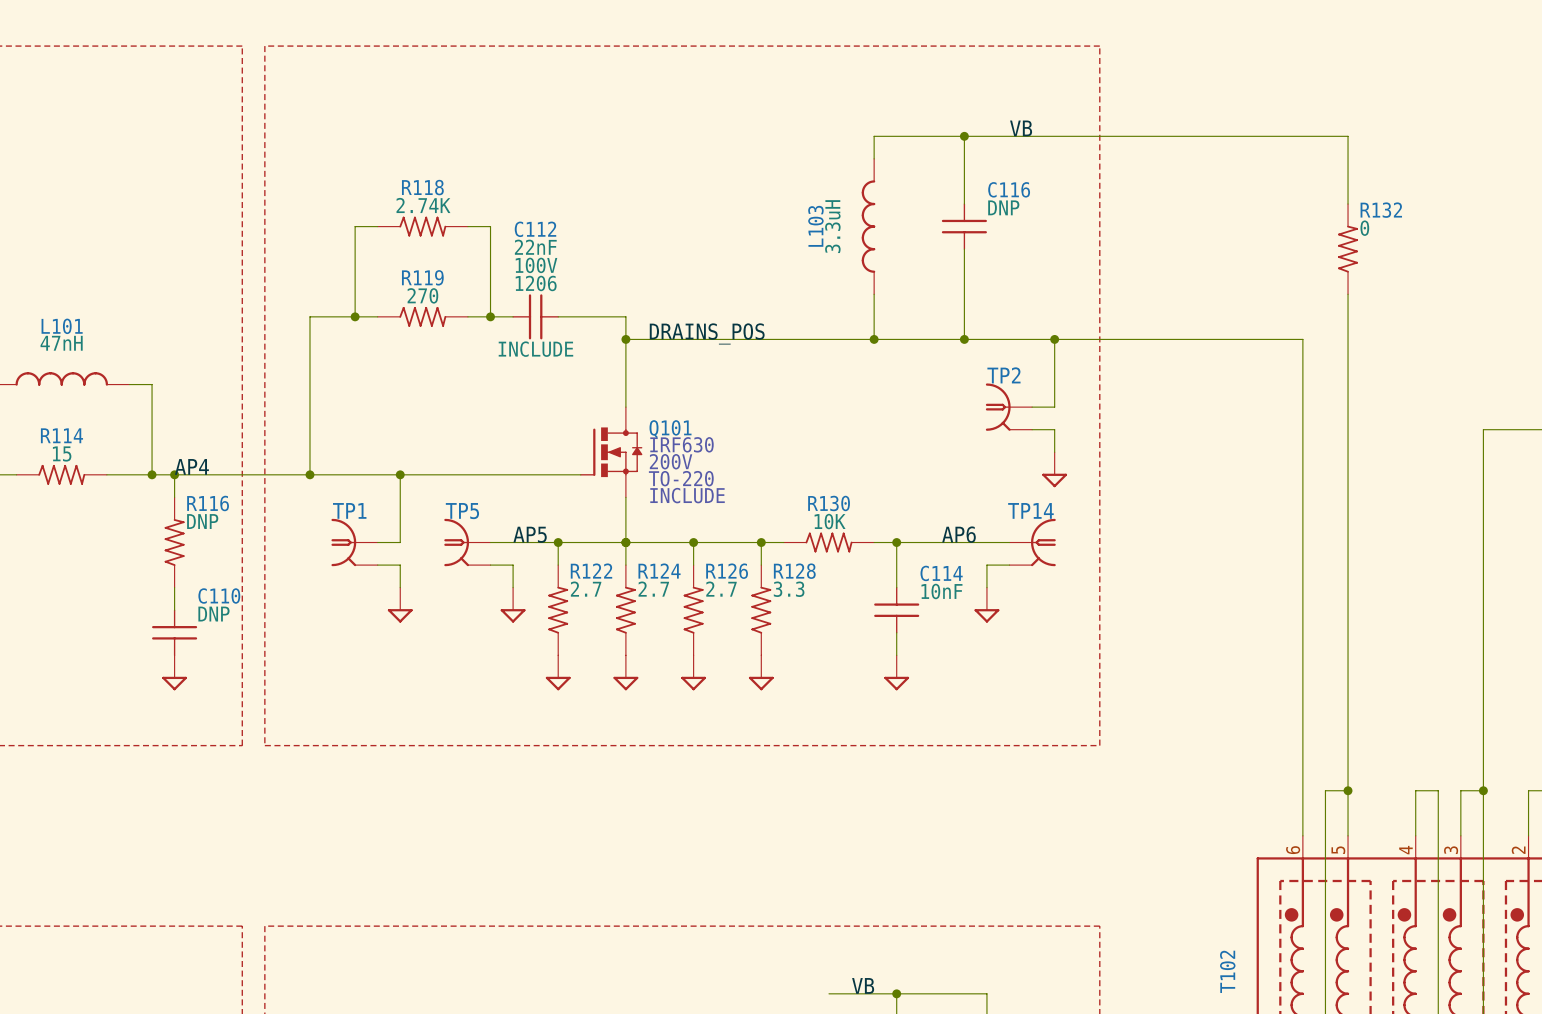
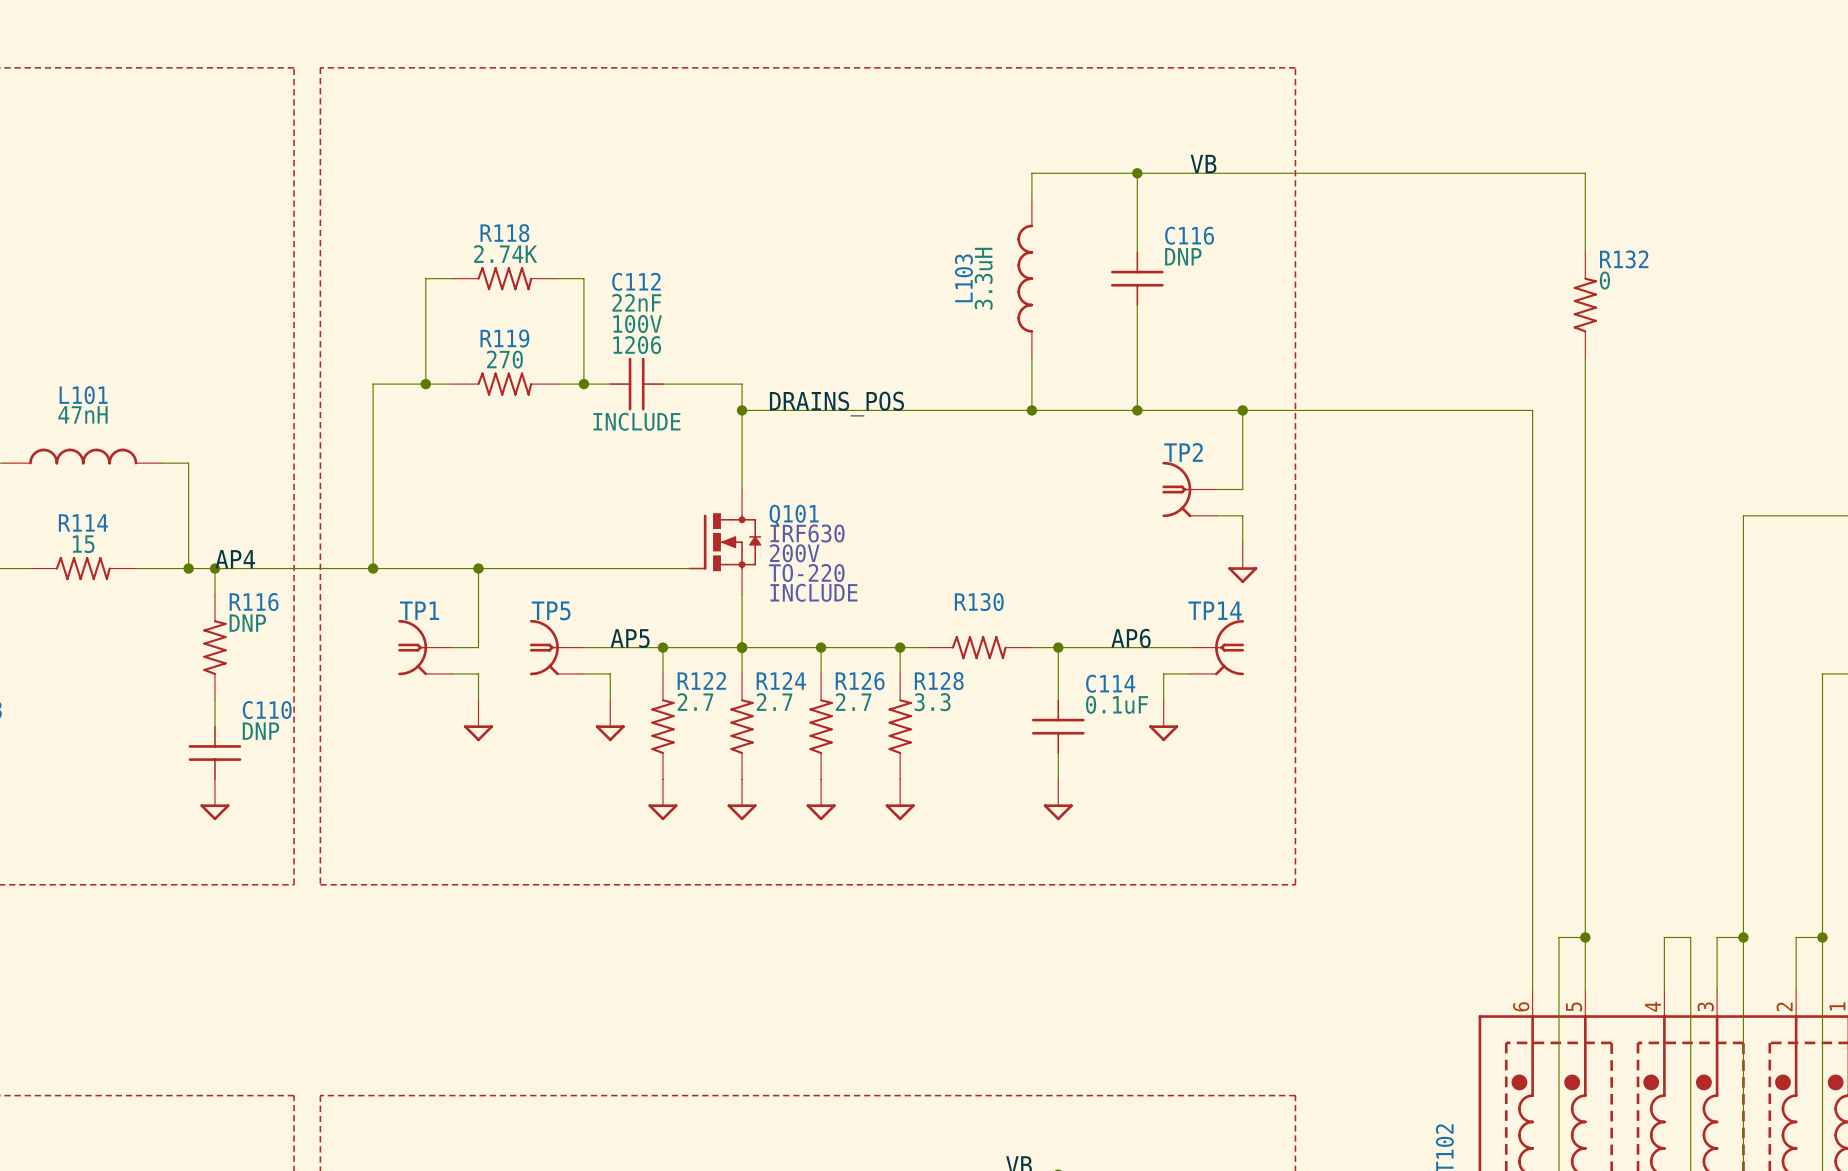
R130 value: 10K (830, 521) -> none
C114 value: 10nF (941, 591) -> 0.1uF (1117, 704)

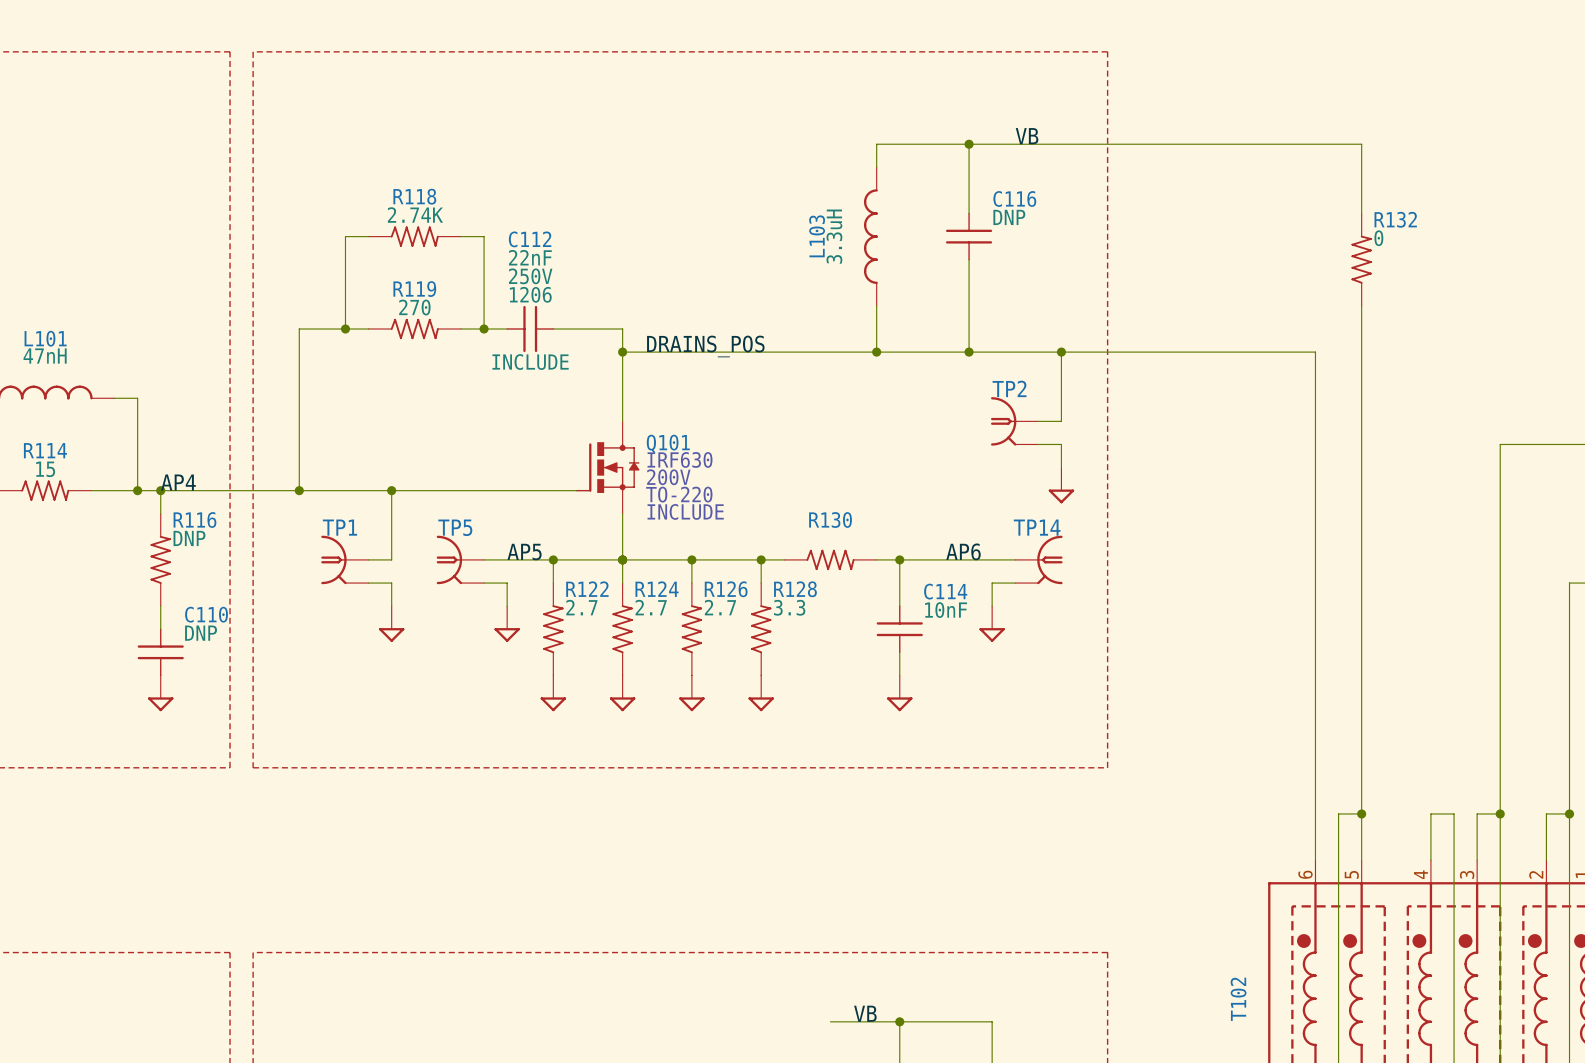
C112 text: 100V (637, 324) -> 250V (530, 276)
C114 value: 0.1uF (1117, 704) -> 10nF (946, 610)

